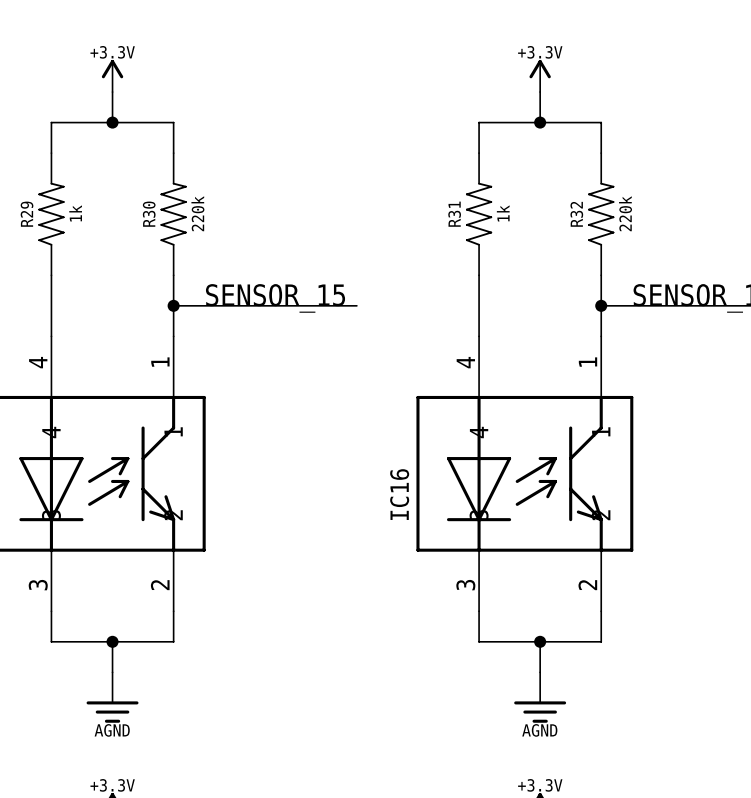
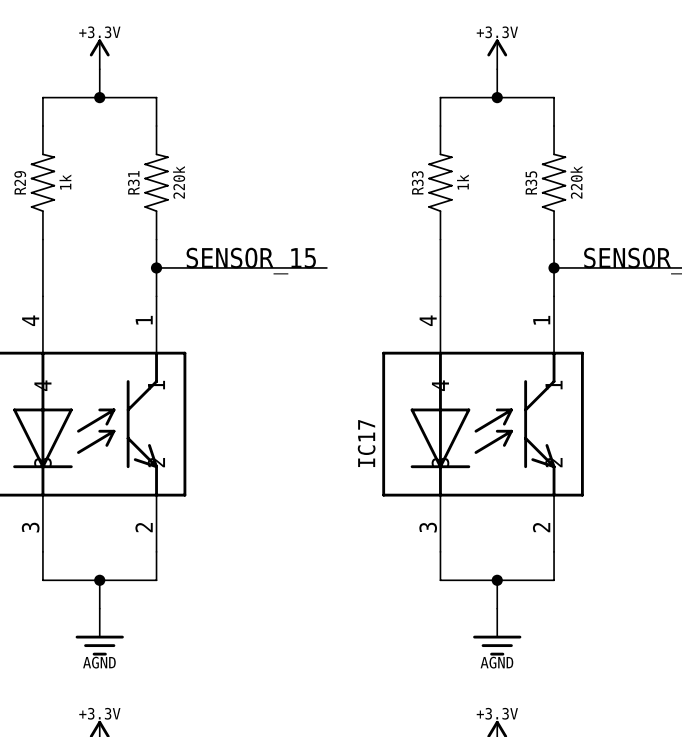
R30 name: R30 (149, 214) -> R31 (133, 182)
R31 name: R31 (454, 214) -> R33 (417, 182)
R32 name: R32 (576, 214) -> R35 (531, 182)
IC16 name: IC16 (399, 494) -> IC17 (366, 443)

